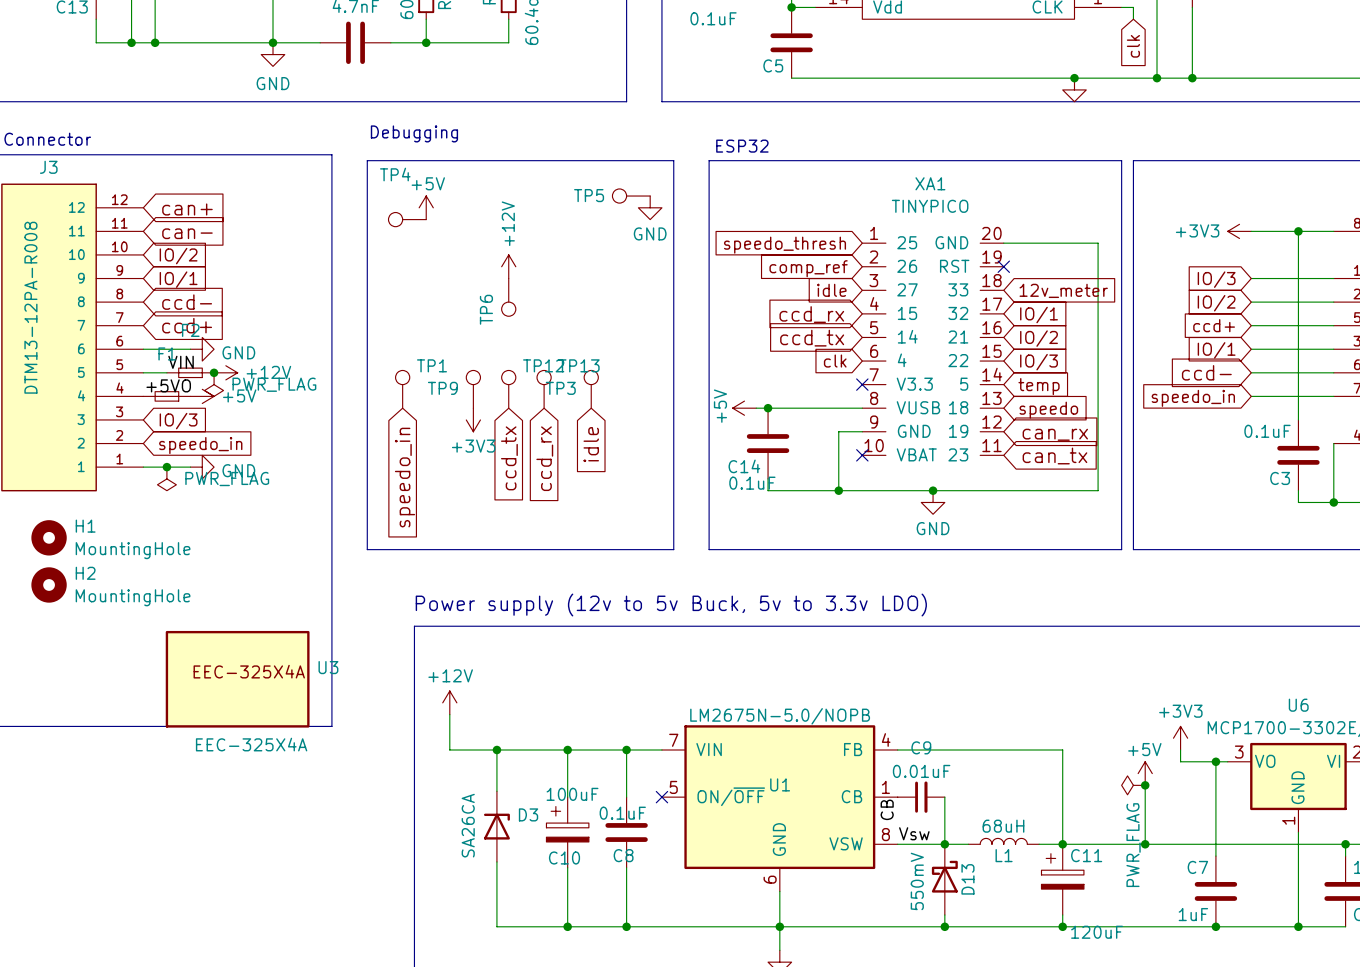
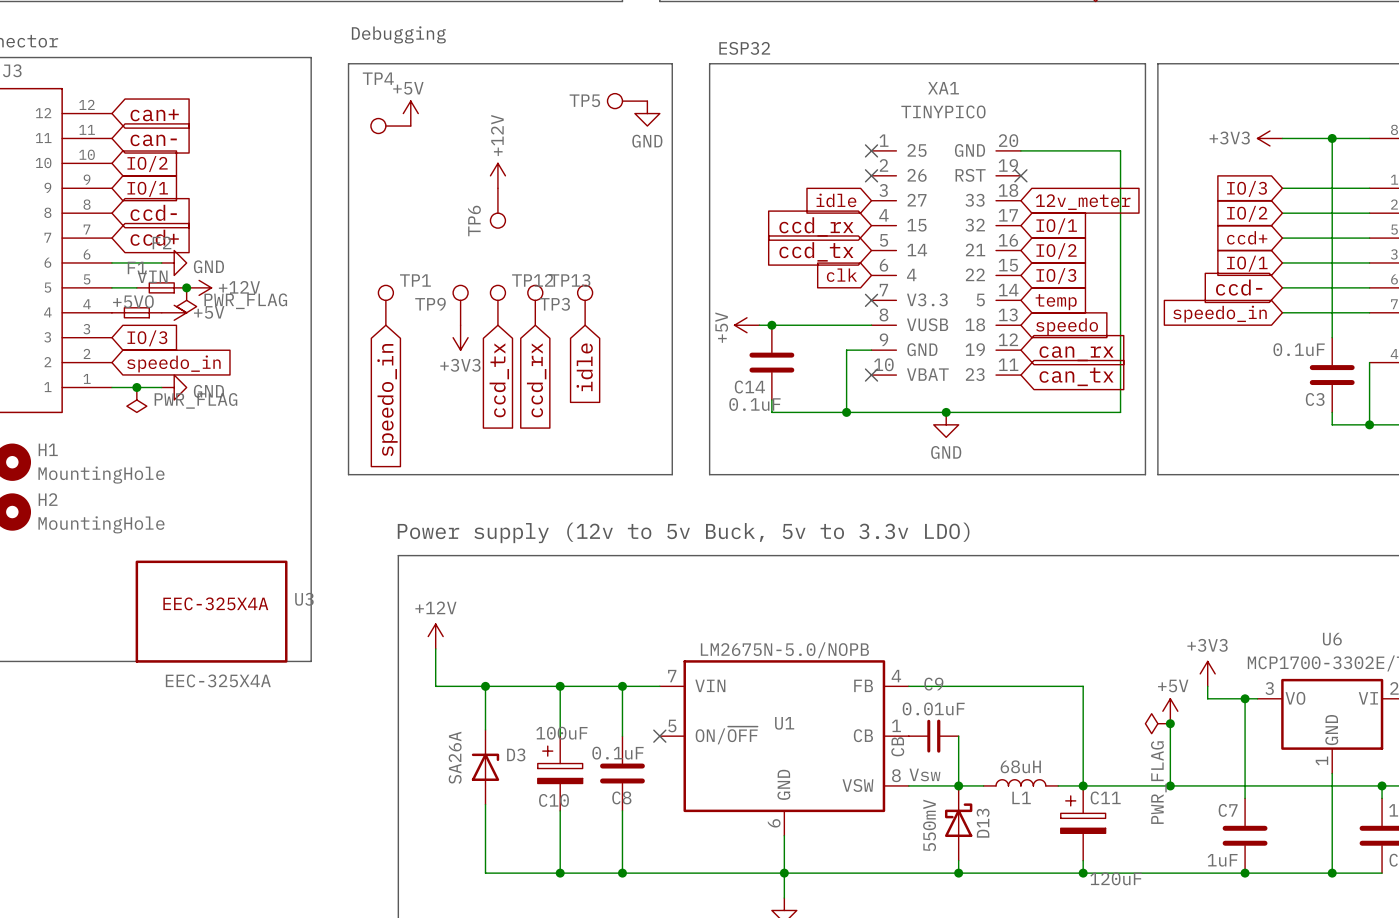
no-connect mark: none -> (871, 150)
global label: speedo_thresh (785, 245) -> none
no-connect mark: none -> (871, 175)
global label: comp_ref (808, 268) -> none
D3 value: SA26CA (468, 825) -> SA26A (455, 757)

